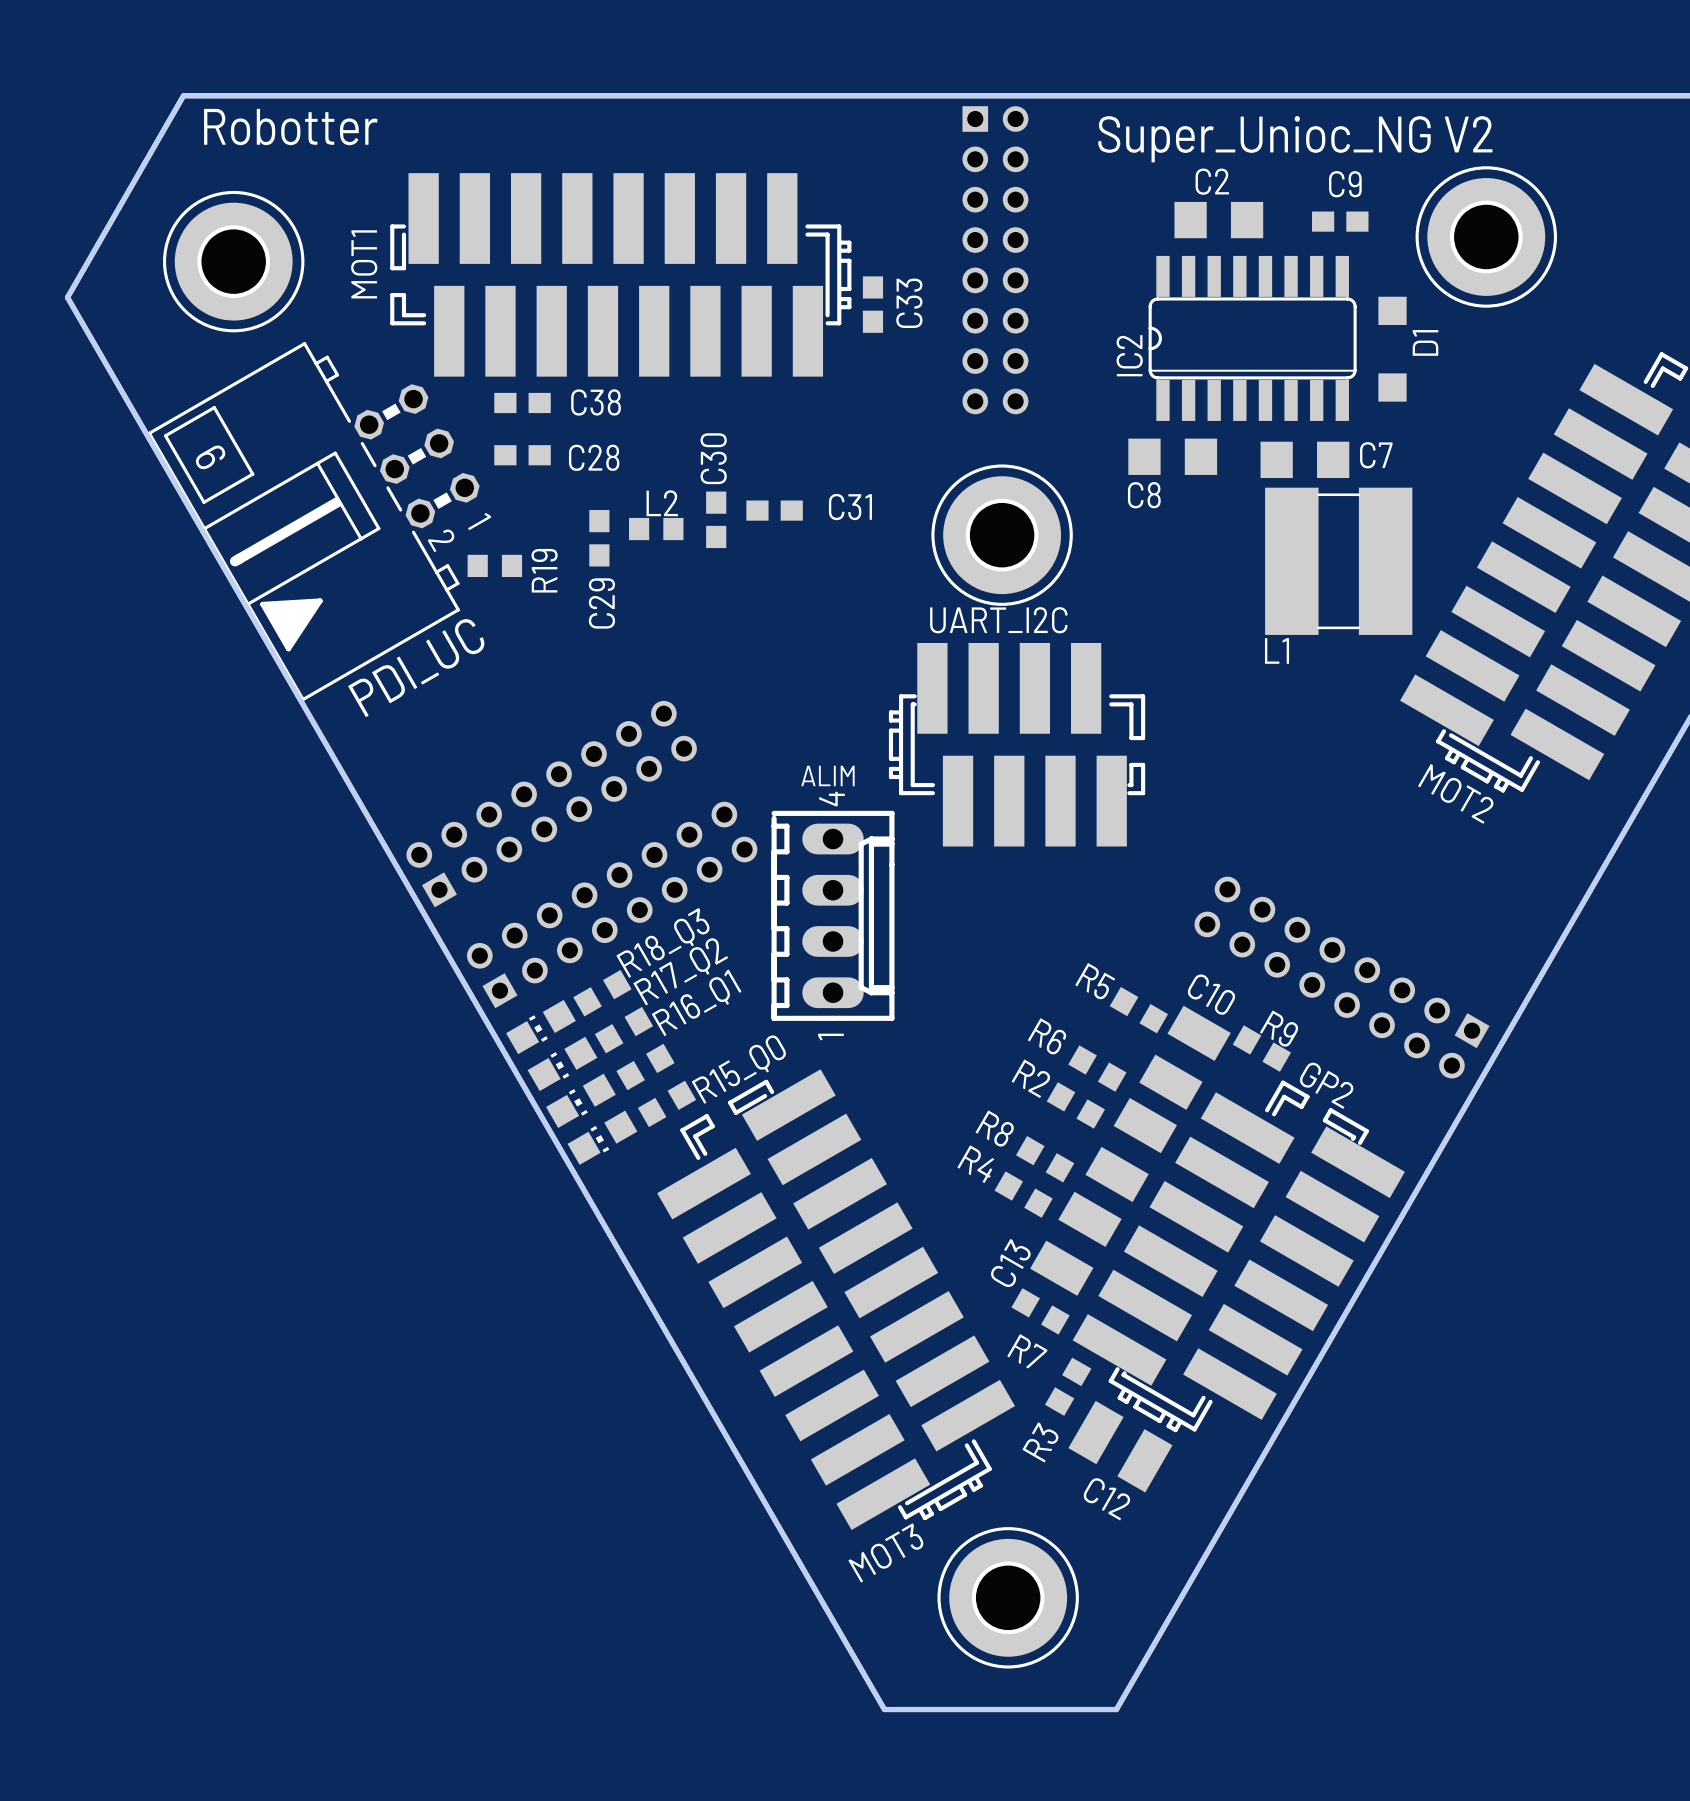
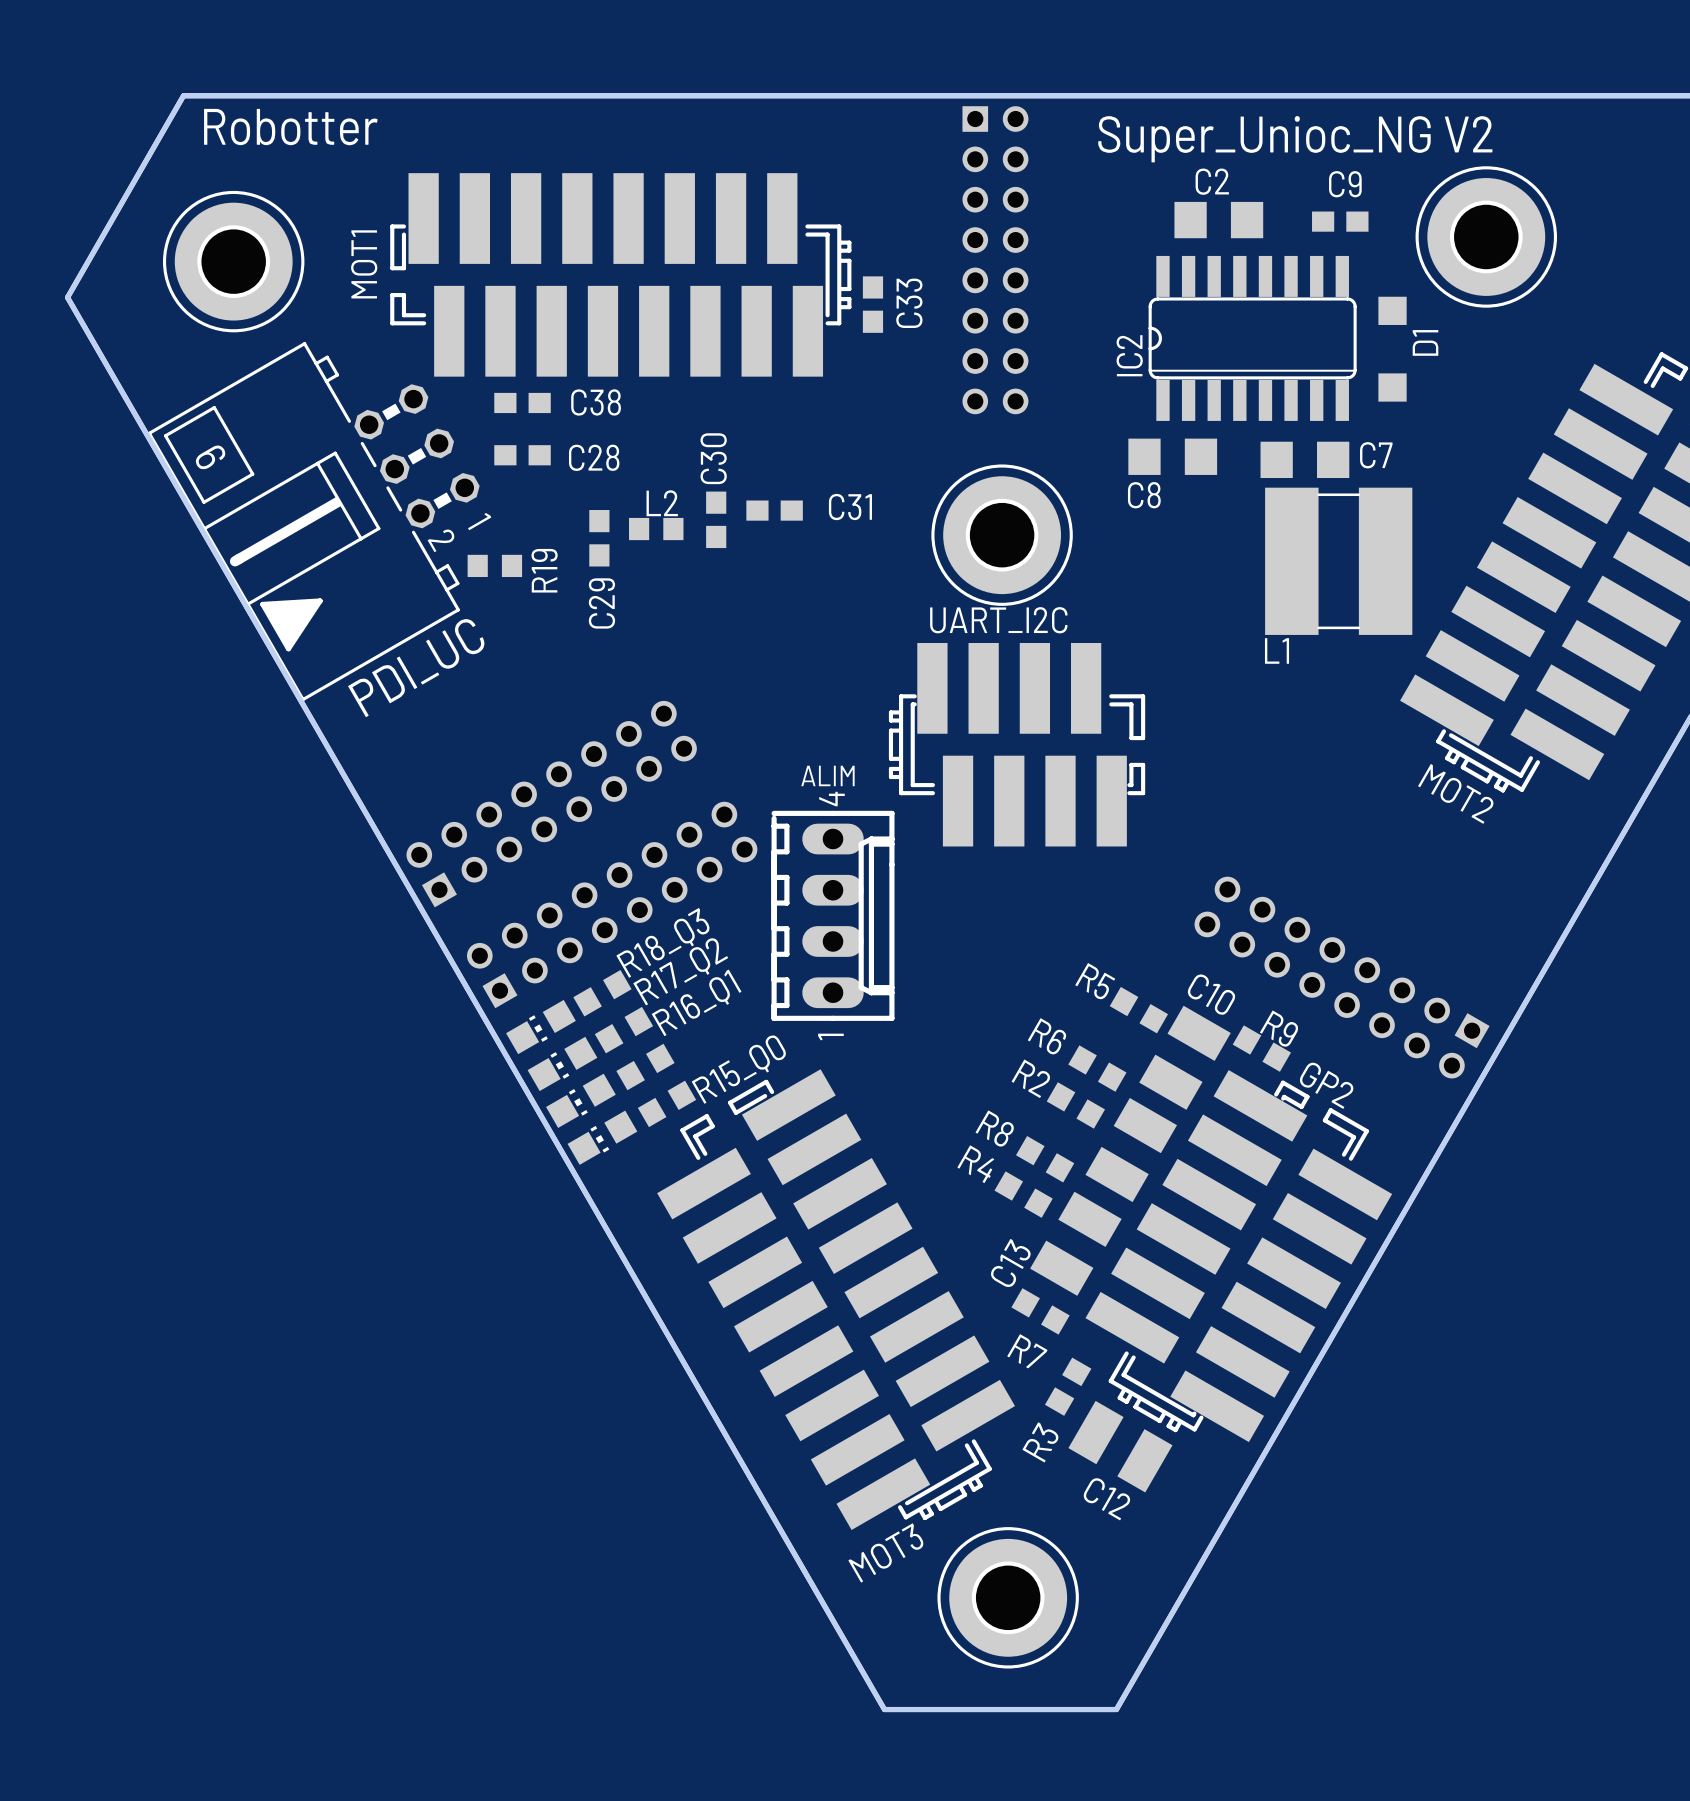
GP2 footprint: [1072, 1080, 1405, 1433] -> [1085, 1070, 1393, 1443]

